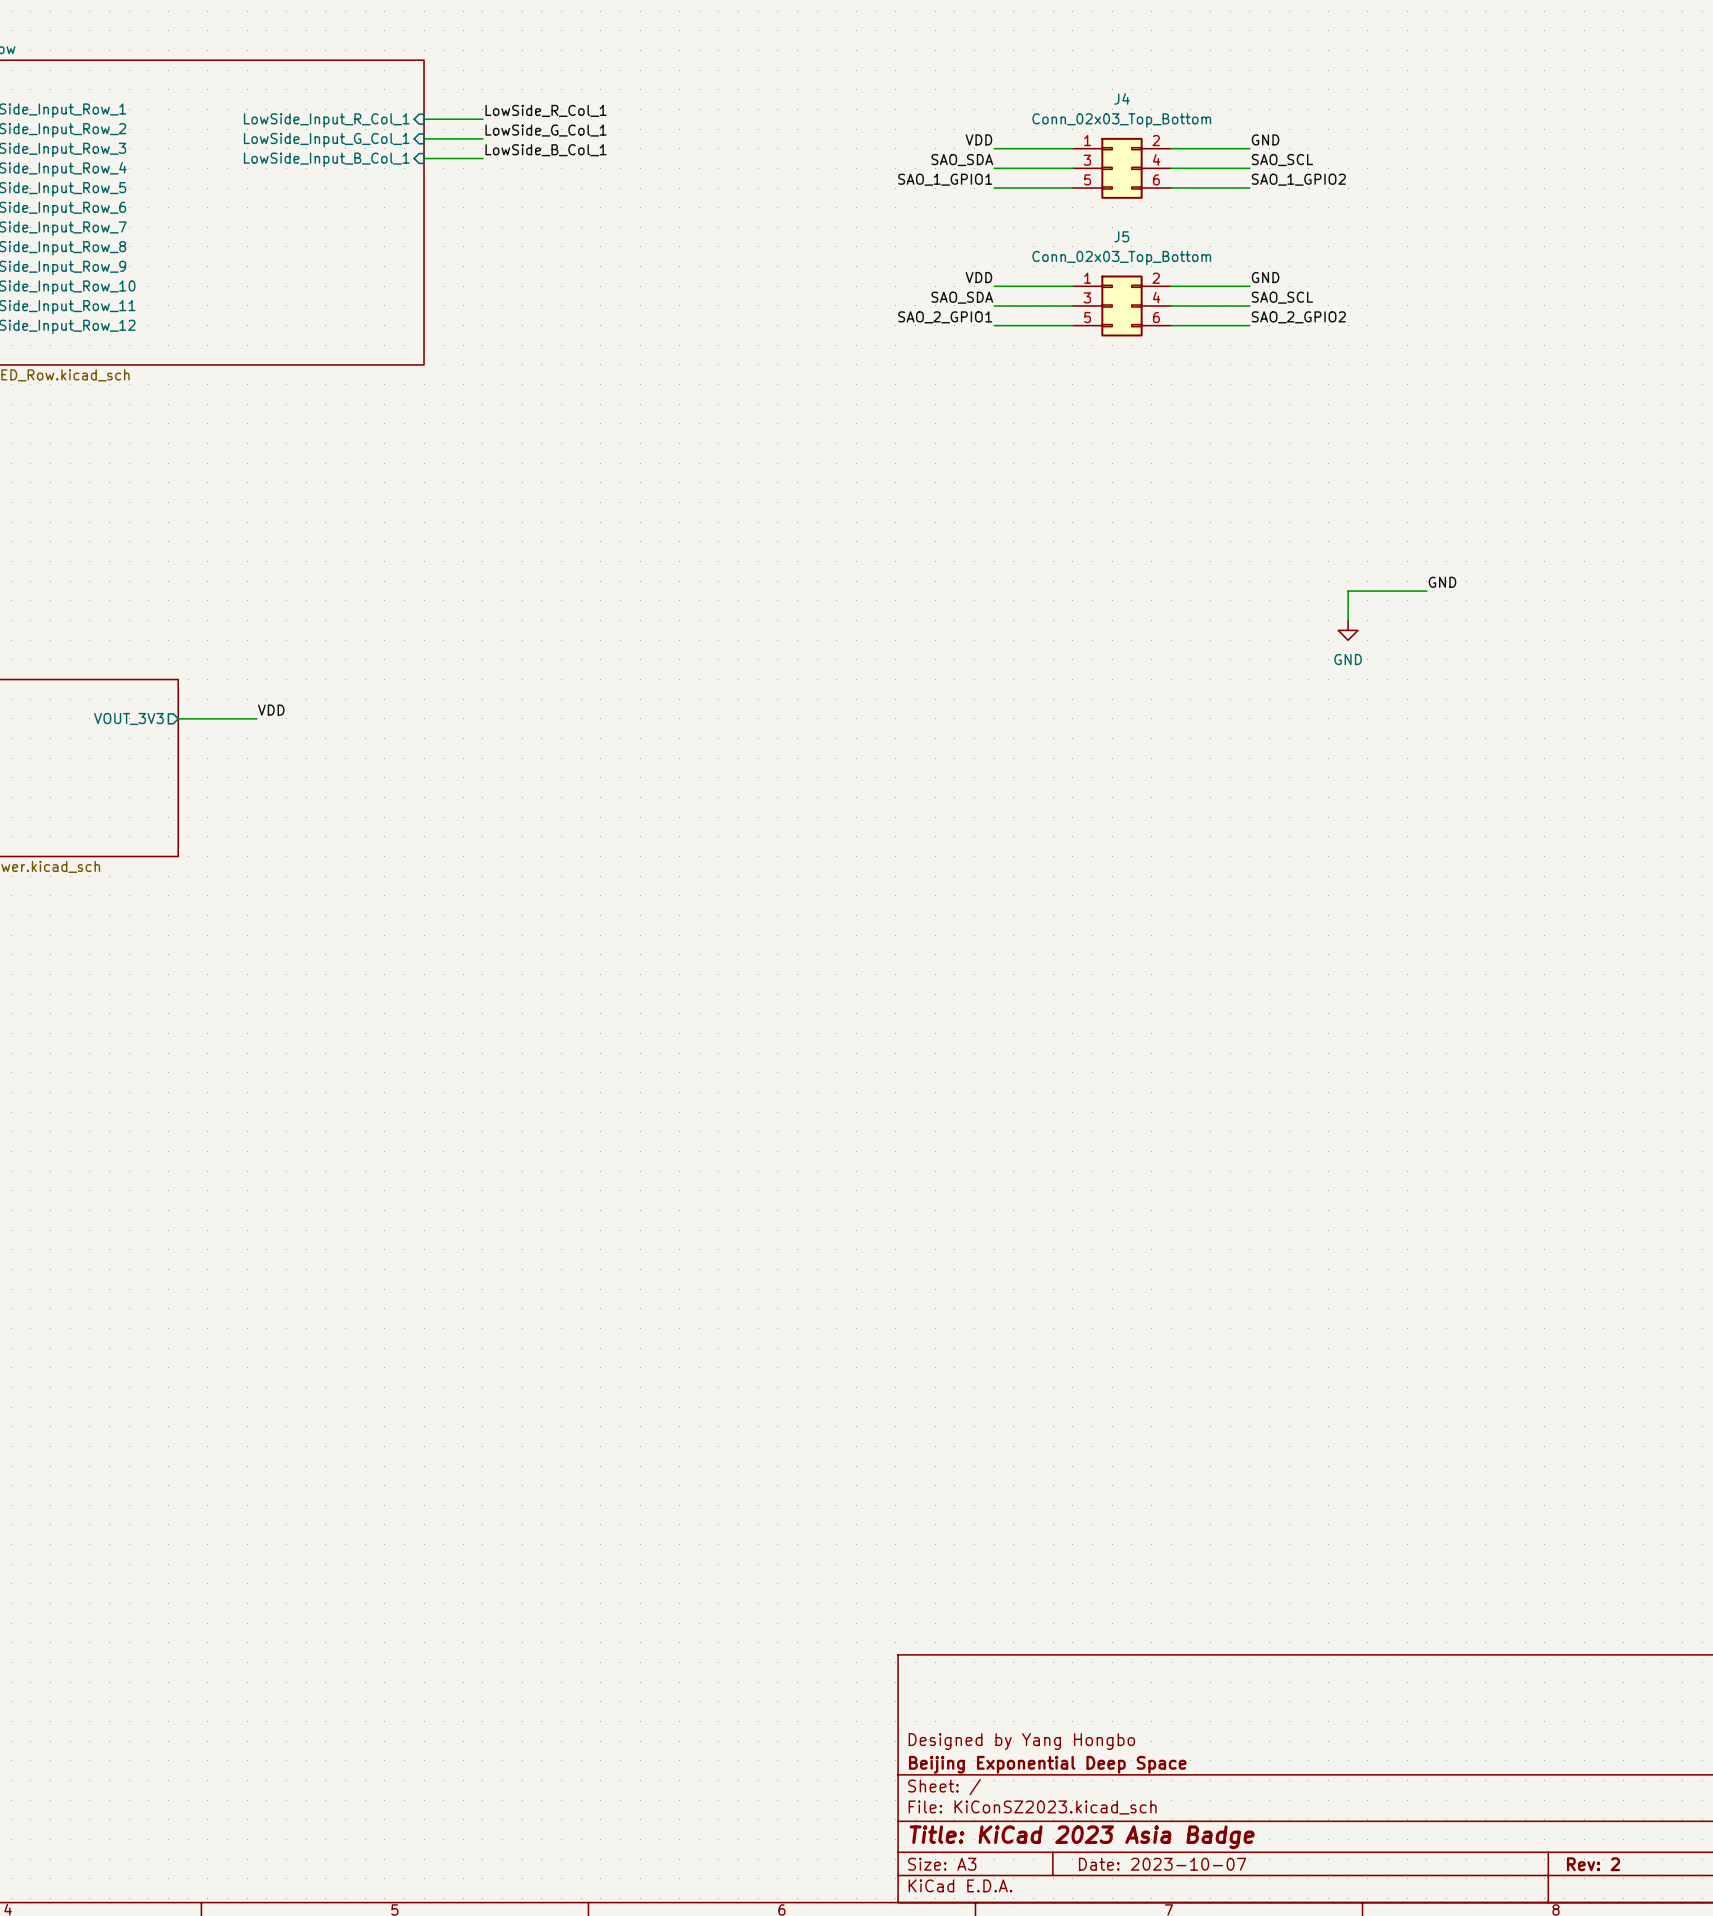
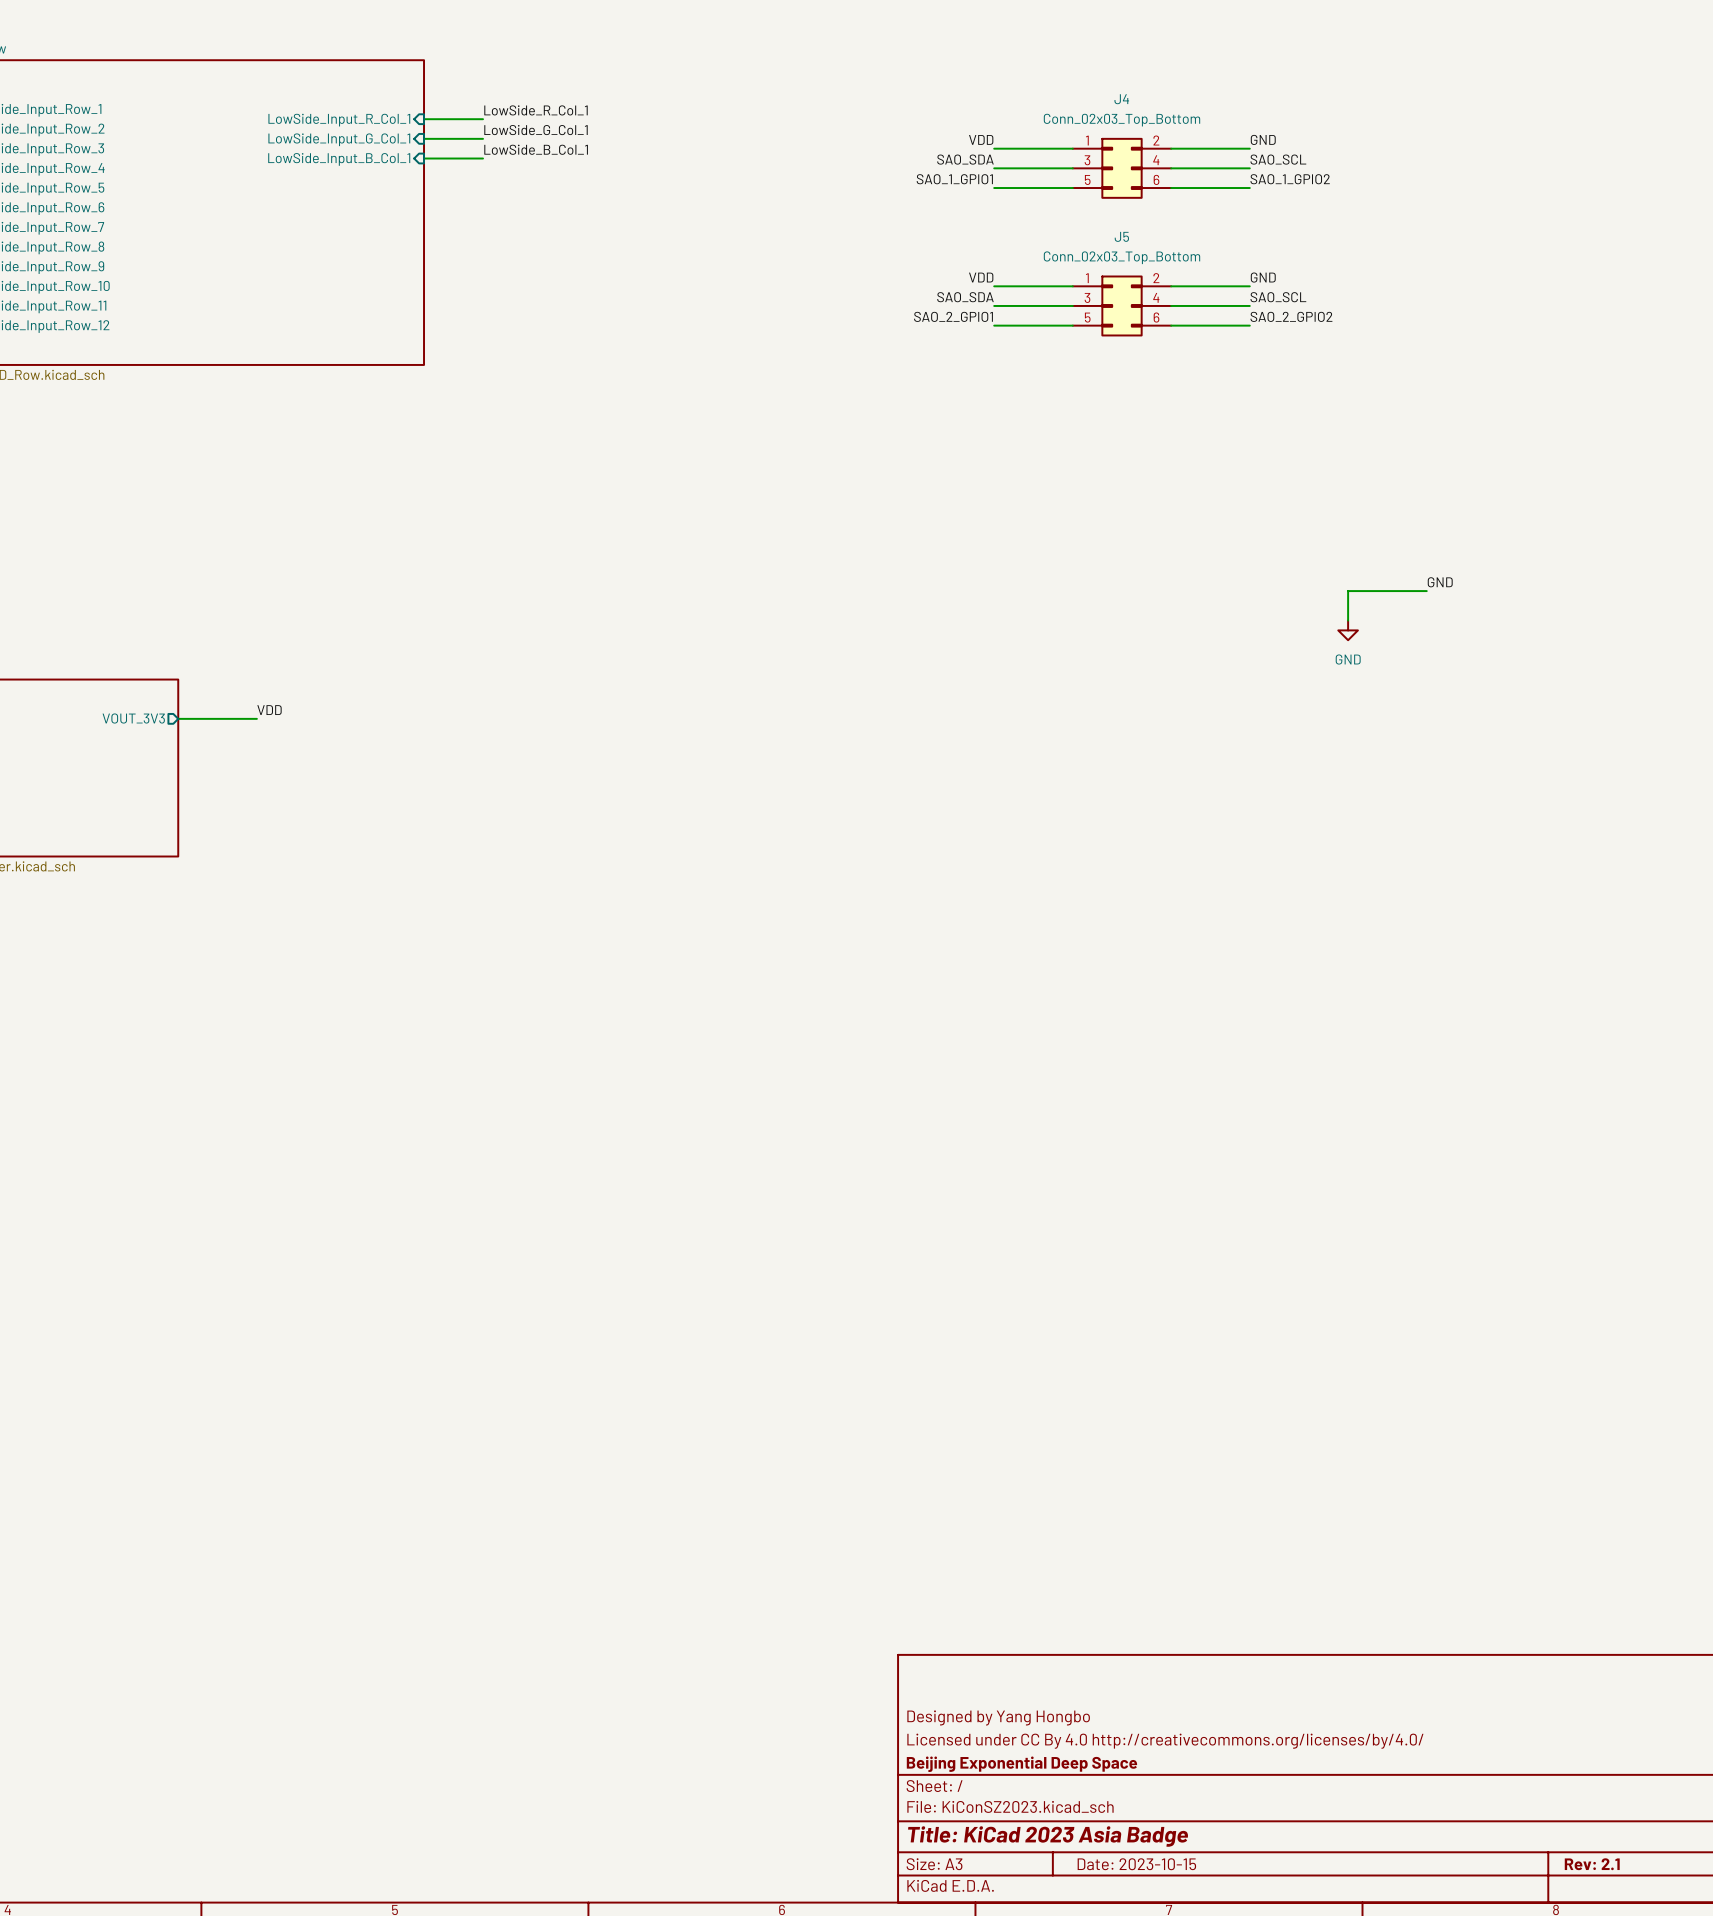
title block: none -> Designed by Yang Hongbo (998, 1717)
title block: Designed by Yang Hongbo (1021, 1741) -> Licensed under CC By 4.0 http://creativecommons.org/licenses/by/4.0/ (1165, 1741)
title block: Date: 2023-10-07 (1162, 1864) -> Date: 2023-10-15 (1136, 1864)
title block: Rev: 2 (1593, 1864) -> Rev: 2.1 (1592, 1864)

